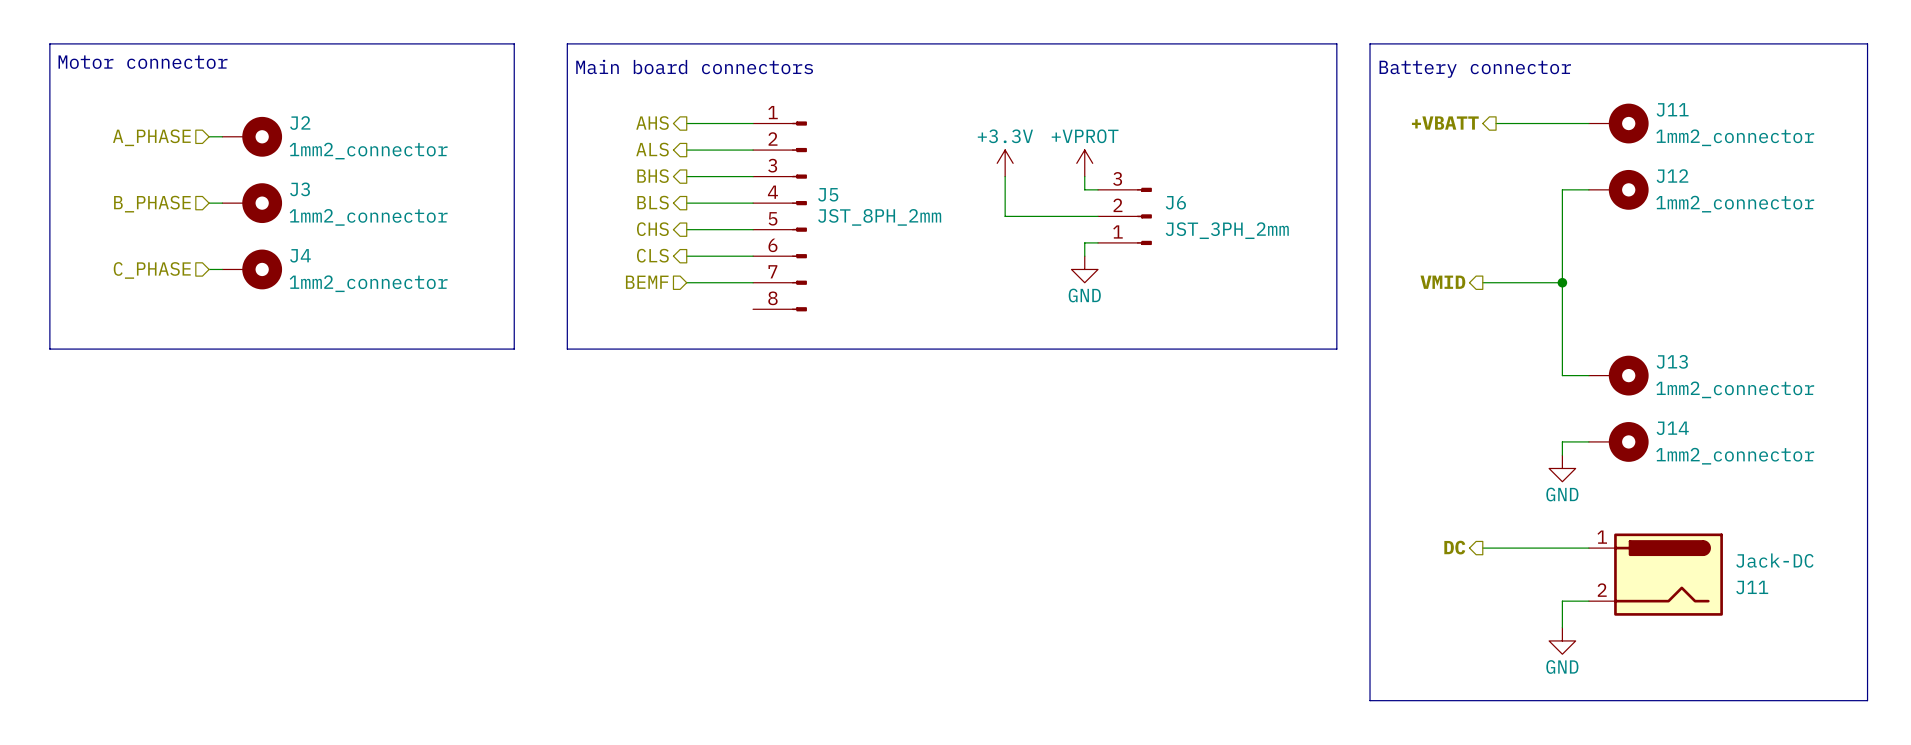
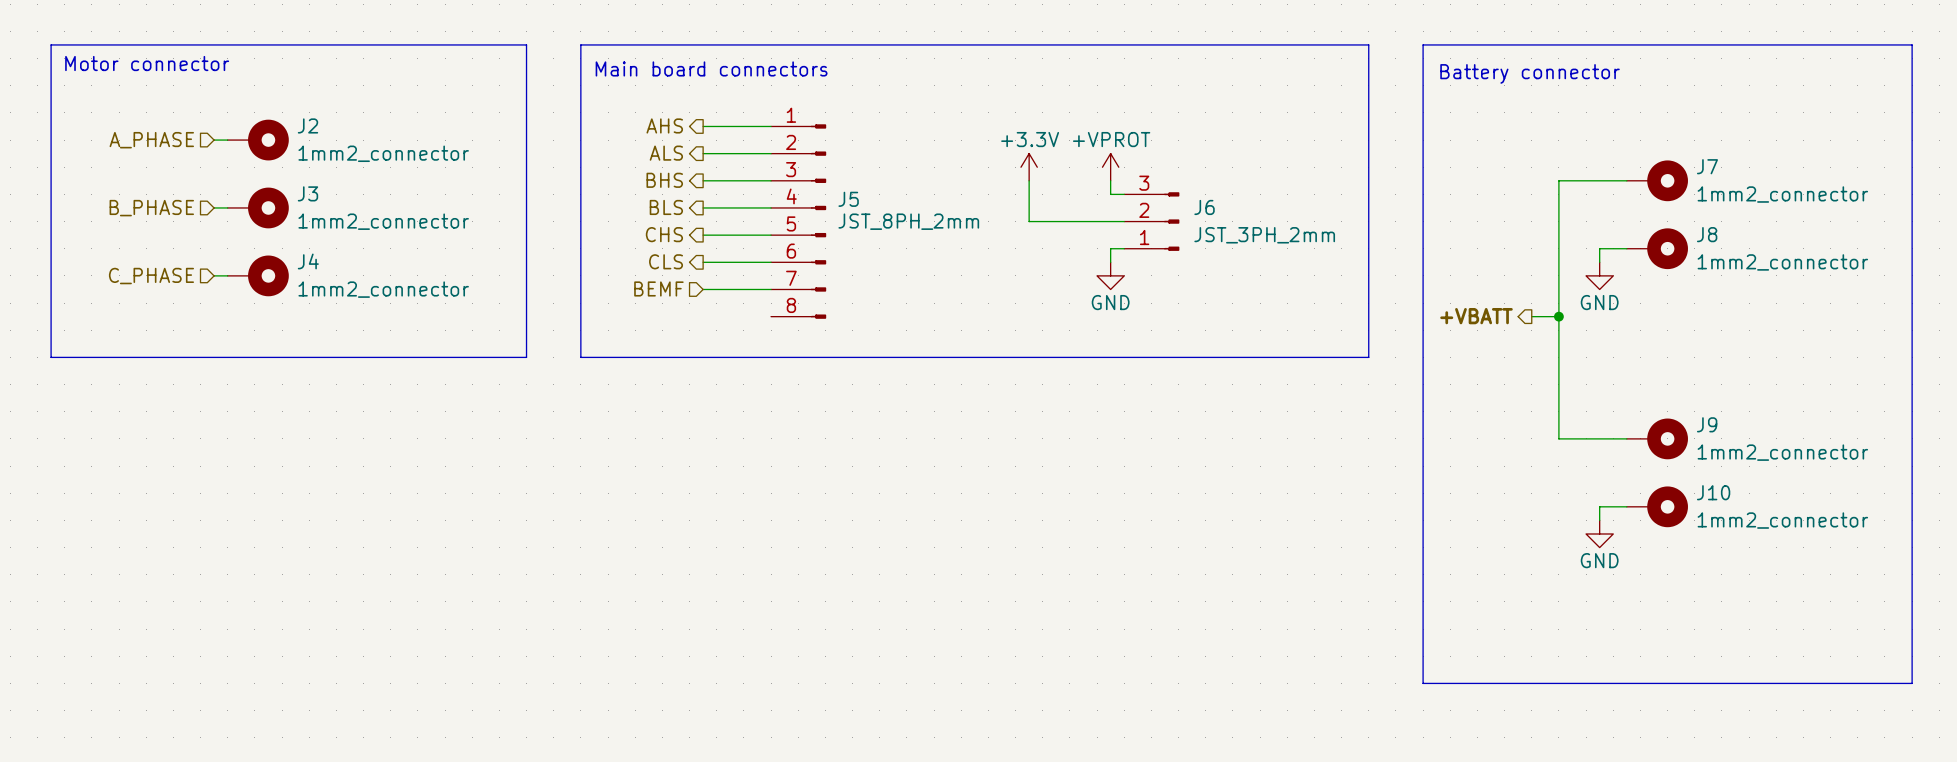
line: (1389, 43) (1370, 43) (1370, 700) (1867, 700) (1867, 667) -> (1423, 44) (1423, 683) (1912, 683)
text position: Battery connector (1475, 69) -> Battery connector (1530, 73)
hierarchical label position: +VBATT (1445, 123) -> +VBATT (1476, 316)
wire: (1496, 123) (1588, 123) -> none
J11: 1mm2_connector (1618, 123) -> none
wire: none -> (1626, 180) (1558, 180) (1558, 438) (1626, 438)
J7: none -> 1mm2_connector (1657, 180)
wire: (1588, 189) (1562, 189) (1562, 242) -> (1626, 248) (1599, 248)
J12: 1mm2_connector (1618, 189) -> none
J8: none -> 1mm2_connector (1657, 248)
wire: (1562, 256) (1562, 375) (1588, 375) -> none
power symbol: none -> GND (1599, 275)
hierarchical label: VMID (1442, 282) -> none
wire: (1482, 282) (1562, 282) -> none
junction position: (1562, 282) -> (1558, 316)
wire: none -> (1531, 316) (1558, 316)
J13: 1mm2_connector (1618, 375) -> none
J9: none -> 1mm2_connector (1657, 438)
wire: (1588, 441) (1562, 441) (1562, 455) -> (1626, 506) (1599, 506) (1599, 520)
J14: 1mm2_connector (1618, 441) -> none
power symbol position: GND (1562, 468) -> GND (1599, 533)
J10: none -> 1mm2_connector (1657, 506)
hierarchical label: DC (1454, 547) -> none
wire: (1482, 548) (1588, 548) -> none
J11: Jack-DC (1655, 574) -> none
wire: (1588, 601) (1562, 601) (1562, 627) -> none
power symbol: GND (1562, 640) -> none

